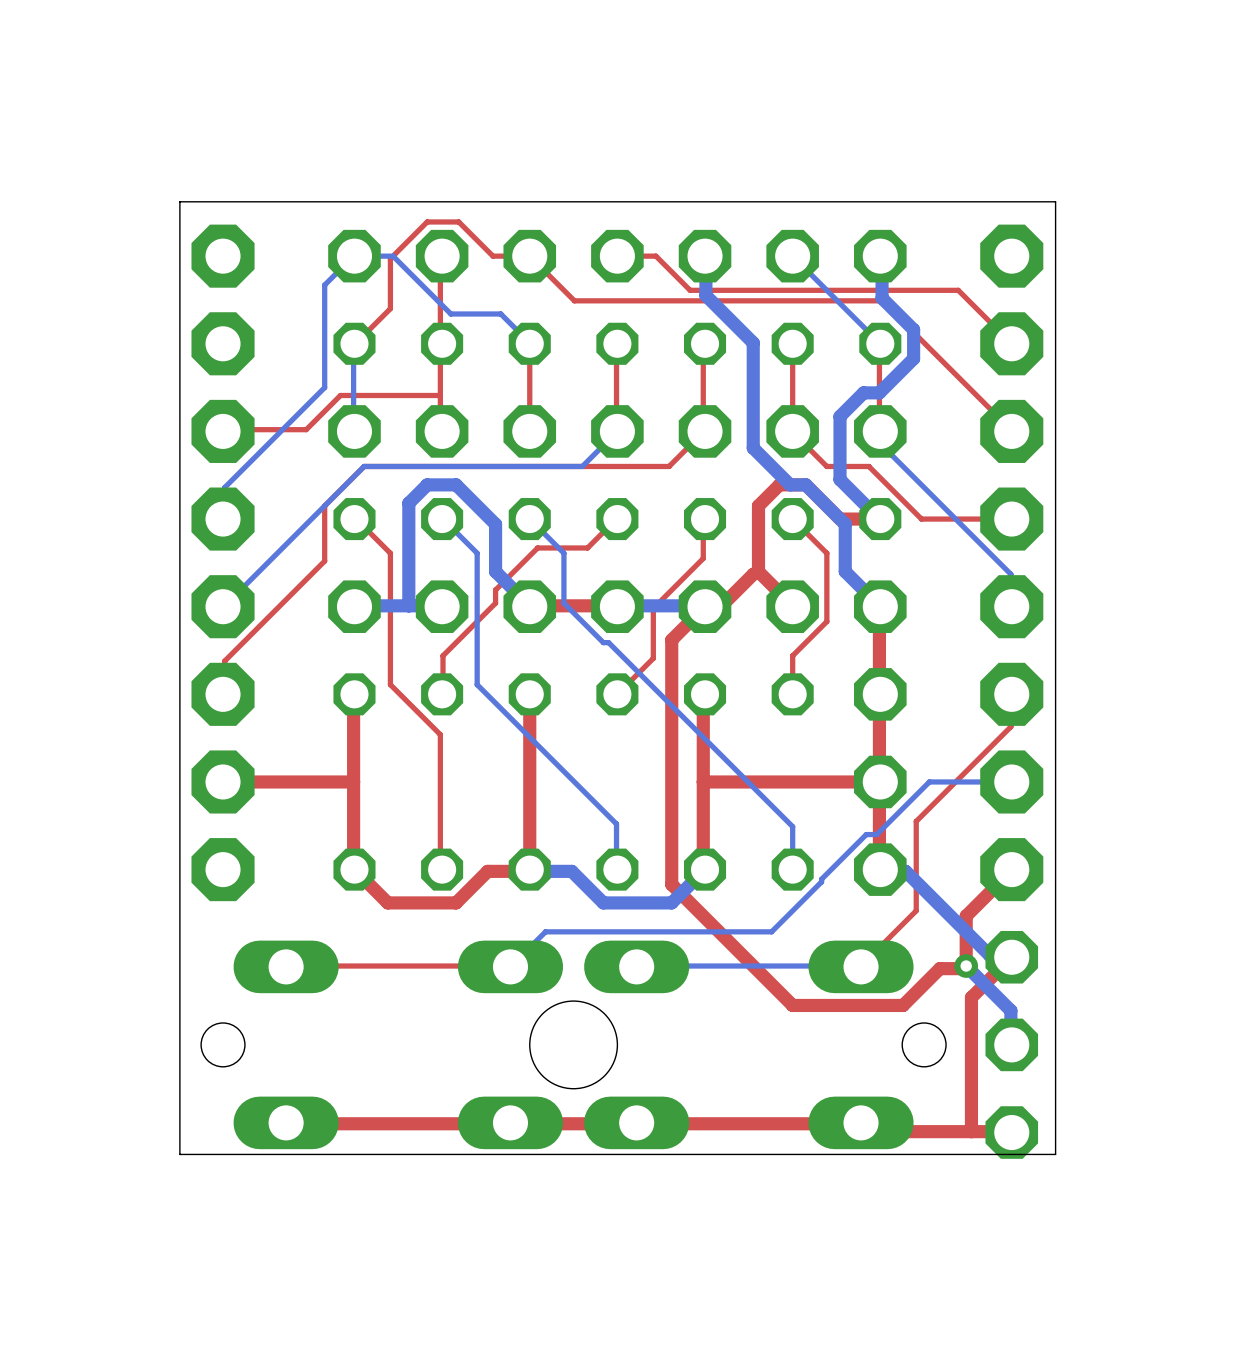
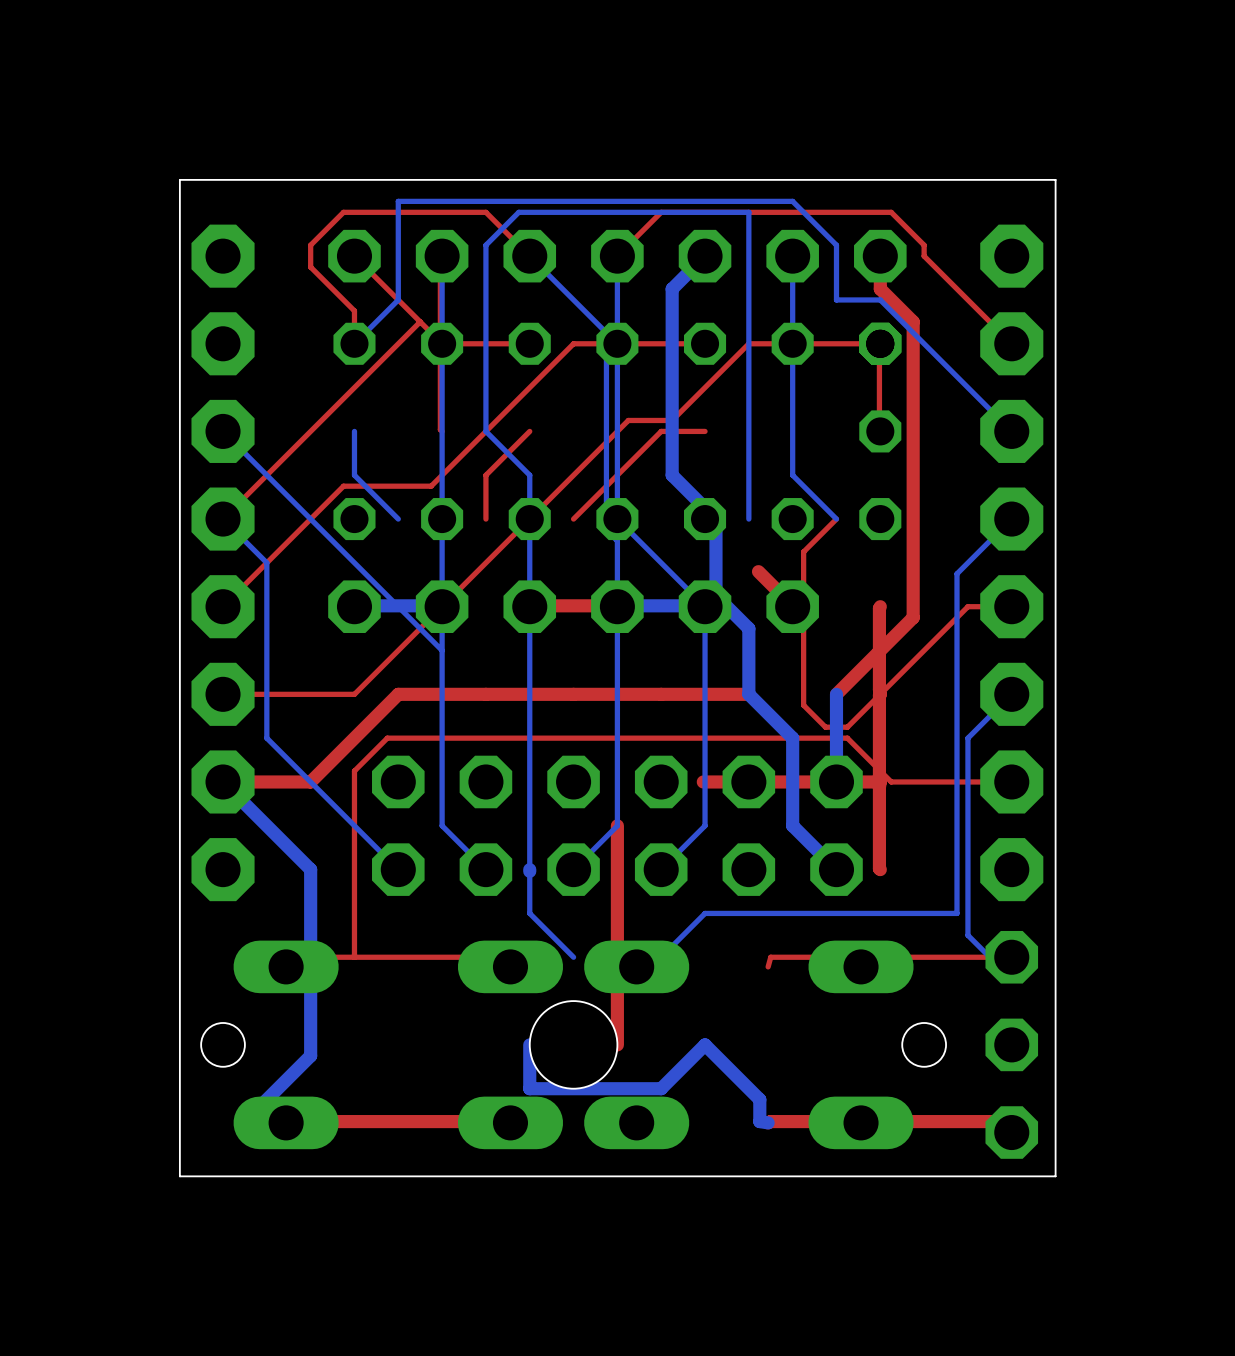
board edge: (1055, 201) (179, 201) -> (1055, 201) (1055, 179) (179, 179) (179, 201)
top track: none -> (354, 256) (442, 343) (529, 343)
bottom track: none -> (442, 256) (442, 825) (485, 869)
bottom track: none -> (529, 256) (606, 332) (606, 530) (617, 540) (617, 825) (573, 869)
bottom track: none -> (617, 256) (617, 519) (705, 606) (705, 825) (661, 869)
top track: (617, 256) (655, 256) (690, 290) (958, 290) -> (617, 256) (661, 212) (891, 212) (924, 245) (924, 256) (958, 290)
bottom track: (705, 256) (705, 295) (753, 342) (753, 448) (790, 484) (805, 484) (845, 524) (845, 571) (880, 606) -> (705, 256) (672, 289) (672, 475) (715, 519) (715, 595) (748, 628) (748, 694) (792, 738) (792, 825) (836, 869)
bottom track: (792, 256) (880, 343) -> (792, 256) (792, 475) (836, 519)
bottom track: (880, 256) (882, 256) (882, 298) (913, 329) (913, 358) (879, 392) (863, 392) (840, 416) (840, 479) (880, 519) -> none
top track: none -> (880, 256) (880, 289) (913, 321) (913, 617) (836, 694)
top track: none -> (420, 321) (223, 519)
bottom track: (354, 343) (354, 431) -> (398, 519) (354, 475) (354, 431)
bottom track: none -> (354, 343) (398, 299) (398, 201) (792, 201) (836, 245) (836, 299) (880, 299) (1011, 431)
top track: (354, 343) (390, 308) (390, 258) (427, 221) (458, 221) (492, 256) (529, 256) (574, 300) (882, 300) (1011, 431) -> (354, 343) (354, 310) (310, 267) (310, 245) (343, 212) (485, 212) (529, 256)
bottom track: (529, 343) (500, 313) (450, 313) (393, 256) (353, 256) (324, 285) (324, 387) (224, 487) (224, 519) (223, 519) -> (398, 869) (266, 738) (266, 562) (223, 519)
top track: (529, 343) (529, 431) -> (485, 519) (485, 475) (529, 431)
top track: (617, 343) (617, 431) -> none
top track: (705, 343) (703, 345) (703, 429) (705, 431) (669, 466) (364, 466) (324, 505) (324, 561) (224, 661) (224, 692) (223, 694) -> (705, 343) (573, 343) (431, 486) (343, 486) (223, 606)
top track: (792, 343) (792, 432) (826, 466) (868, 466) (921, 519) (1011, 519) -> none
top track: none -> (880, 343) (748, 343) (672, 420) (628, 420) (354, 694) (223, 694)
part: none -> (880, 387)
top track: (440, 395) (340, 395) (306, 429) (224, 429) (223, 431) -> none
bottom track: none -> (223, 431) (442, 650)
bottom track: (617, 431) (582, 466) (364, 466) (223, 606) -> none
part: (617, 431) -> none
top track: none -> (705, 431) (661, 431) (573, 519)
bottom track: (880, 431) (882, 432) (882, 445) (1010, 574) (1011, 606) -> none
top track: (354, 519) (390, 553) (390, 684) (440, 734) (440, 868) (442, 869) -> none
bottom track: (442, 519) (477, 553) (477, 684) (616, 824) (617, 869) -> none
bottom track: (529, 519) (563, 553) (563, 603) (603, 642) (608, 642) (792, 826) (792, 869) -> none
top track: (617, 519) (587, 547) (537, 547) (495, 590) (495, 603) (442, 655) (442, 694) -> none
top track: (705, 519) (703, 519) (703, 558) (653, 608) (653, 658) (617, 694) -> none
bottom track: none -> (748, 519) (748, 212) (518, 212) (485, 245) (485, 431) (529, 475) (529, 913) (573, 957)
top track: (792, 519) (826, 553) (826, 621) (792, 655) (792, 694) -> none
top track: none -> (836, 519) (803, 551) (803, 705) (825, 727) (847, 727) (967, 606) (1011, 606)
top track: (880, 519) (840, 519) (805, 484) (779, 484) (758, 505) (758, 571) (753, 574) (721, 605) (705, 605) (671, 640) (671, 884) (792, 1005) (903, 1005) (939, 968) (960, 968) (966, 966) (966, 916) (1011, 869) -> none
bottom track: none -> (1011, 519) (956, 573) (956, 913) (705, 913) (661, 957)
bottom track: (529, 605) (495, 571) (495, 524) (456, 484) (427, 484) (408, 503) (408, 605) -> none
part: (398, 694) -> none
top track: (529, 694) (529, 869) (524, 871) (487, 871) (456, 902) (387, 902) (353, 868) (354, 694) -> none
part: (573, 694) -> none
top track: (705, 694) (703, 695) (703, 868) (705, 869) -> none
part: (748, 694) -> none
bottom track: none -> (836, 694) (836, 781)
bottom track: none -> (1011, 694) (967, 738) (967, 935) (989, 957) (992, 966)
top track: (1011, 694) (1010, 726) (916, 821) (916, 910) (861, 966) -> none
part: (880, 738) -> none
bottom track: none -> (223, 781) (310, 869) (310, 1055) (242, 1122)
top track: (353, 781) (310, 781) -> (748, 694) (398, 694) (310, 781)
part: none -> (617, 781)
bottom track: (1011, 781) (929, 781) (876, 834) (866, 834) (771, 931) (545, 931) (510, 966) -> none
top track: none -> (1011, 781) (891, 781) (847, 738) (387, 738) (354, 771) (354, 957)
top track: none -> (617, 825) (617, 1044)
part: (398, 869) -> none
part: (573, 869) -> none
part: none -> (617, 869)
bottom track: (705, 869) (671, 902) (603, 902) (571, 871) (529, 871) -> none
part: (748, 869) -> none
bottom track: (880, 869) (882, 871) (905, 871) (989, 955) (1010, 955) (1011, 957) -> none
top track: (1011, 957) (971, 997) (971, 1131) -> none
top track: none -> (466, 966) (464, 957) (244, 957) (242, 966)
top track: (510, 966) (286, 966) -> none
bottom track: (861, 966) (636, 966) -> none
bottom track: (966, 966) (1010, 1010) (1011, 1044) -> none
via: (966, 966) -> none
top track: none -> (992, 966) (989, 957) (770, 957) (768, 966)
bottom track: none -> (529, 1044) (529, 1088) (661, 1088) (705, 1044) (759, 1099) (759, 1121) (768, 1122)
top track: (286, 1122) (861, 1122) (868, 1131) (1011, 1132) -> none
top track: none -> (466, 1122) (242, 1122)
top track: none -> (992, 1122) (768, 1122)
board edge: (1055, 1154) (179, 1154) -> (1055, 1154) (1055, 1176) (179, 1176) (179, 1154)

